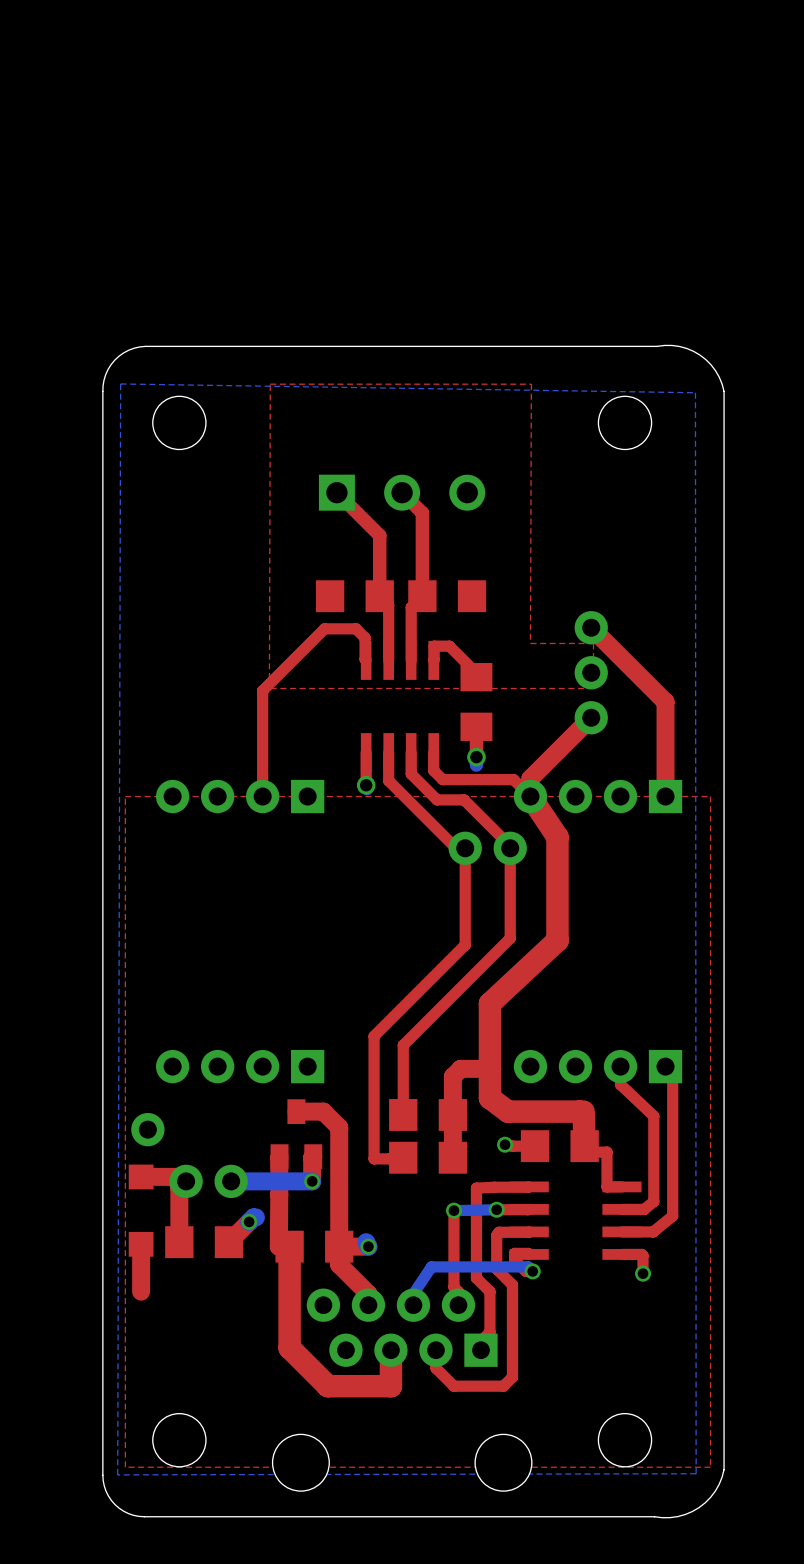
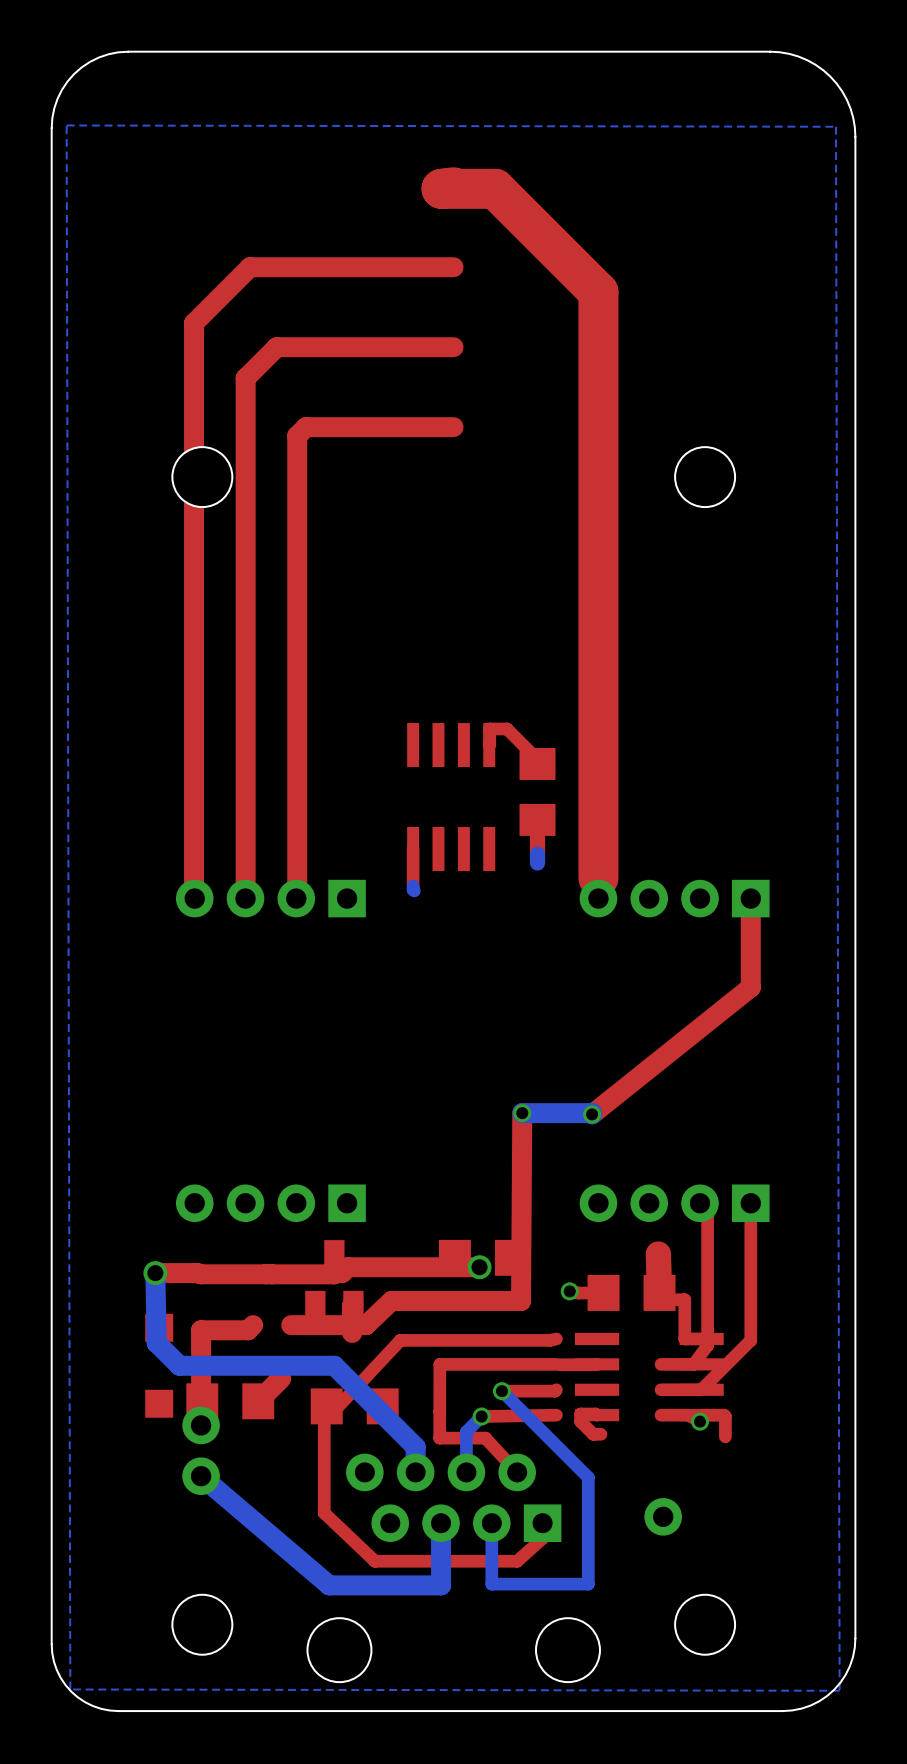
top track: none -> (453, 267) (250, 267) (194, 323) (194, 898)
top track: none -> (453, 347) (276, 347) (245, 378) (245, 898)
bottom zone outline: (120, 383) (117, 1474) (696, 1473) (695, 392) (120, 383) -> (66, 125) (835, 126) (839, 1690) (70, 1689) (66, 125)
top zone outline: (531, 384) (270, 384) (269, 688) (593, 688) (593, 643) (530, 643) (531, 384) -> none
top track: (336, 492) (379, 535) (379, 596) (388, 605) (388, 660) -> none
top track: (402, 492) (422, 512) (422, 596) (411, 607) (411, 660) -> none
part: (402, 492) -> none
part: (354, 596) -> none
part: (447, 596) -> none
top track: (591, 627) (665, 701) (665, 796) -> (592, 1114) (750, 987) (750, 898)
top track: (366, 660) (365, 637) (356, 628) (324, 628) (262, 690) (262, 796) -> (453, 427) (306, 427) (297, 435) (296, 898)
part: (591, 672) -> none
top track: (591, 717) (530, 778) -> (453, 187) (441, 188) (495, 188) (598, 292) (598, 878)
top track: (388, 752) (388, 780) (465, 857) (465, 945) (374, 1036) (374, 1158) (403, 1157) -> none
top track: (411, 752) (411, 774) (437, 799) (464, 799) (510, 846) (510, 938) (403, 1045) (403, 1114) -> none
top track: (433, 752) (433, 770) (442, 779) (513, 779) (530, 796) (557, 837) (557, 940) (489, 1003) (489, 1098) (507, 1111) (579, 1111) (583, 1115) -> none
via: (476, 757) -> none
via: (366, 785) -> none
top zone outline: (710, 796) (710, 1467) (125, 1467) (125, 796) (710, 796) -> none
part: (487, 848) -> none
top track: none -> (522, 1113) (521, 1301) (391, 1301) (366, 1325) (291, 1325)
bottom track: none -> (522, 1113) (592, 1114)
via: none -> (522, 1113)
via: none -> (592, 1114)
top track: (620, 1066) (620, 1084) (653, 1116) (653, 1201) (644, 1209) (621, 1209) -> (700, 1203) (707, 1210) (707, 1345) (693, 1364) (661, 1364)
top track: (665, 1066) (672, 1072) (672, 1216) (653, 1231) (621, 1231) -> (750, 1203) (750, 1340) (701, 1389) (661, 1389)
top track: (489, 1068) (460, 1068) (452, 1076) (452, 1157) -> none
top track: (296, 1111) (323, 1111) (339, 1127) (339, 1246) (368, 1246) -> none
top track: none -> (479, 1267) (347, 1267) (341, 1273) (339, 1269) (334, 1274) (155, 1273)
via: none -> (479, 1267)
bottom track: none -> (155, 1273) (156, 1342) (179, 1365) (334, 1365) (415, 1447) (415, 1472)
via: none -> (155, 1273)
part: (147, 1129) -> none
top track: (279, 1156) (278, 1246) (289, 1246) (289, 1347) (327, 1386) (390, 1386) (390, 1350) -> none
part: (428, 1157) -> none
top track: none -> (253, 1325) (248, 1330) (201, 1330) (201, 1425)
top track: (141, 1176) (177, 1176) (177, 1181) (186, 1181) (186, 1188) (179, 1188) (179, 1242) -> none
part rotation: 0° (208, 1181) -> 90° clockwise (201, 1450)
part position: (208, 1181) -> (201, 1450)
bottom track: (312, 1181) (231, 1181) -> none
via: (312, 1181) -> none
top track: (529, 1186) (476, 1188) (476, 1278) (489, 1291) (489, 1332) (480, 1341) (480, 1350) -> (556, 1338) (400, 1340) (324, 1421) (324, 1513) (375, 1561) (517, 1561) (542, 1538) (542, 1523)
bottom track: (496, 1209) (453, 1210) -> none
via: (496, 1209) -> none
top track: (453, 1210) (453, 1287) (458, 1291) (458, 1305) -> (556, 1364) (439, 1364) (439, 1438) (485, 1438) (517, 1472)
via position: (453, 1210) -> (501, 1391)
bottom track: (255, 1217) (249, 1221) -> none
via: (249, 1221) -> none
top track: none -> (556, 1389) (501, 1391)
top track: (529, 1231) (498, 1232) (496, 1235) (496, 1269) (512, 1284) (512, 1377) (503, 1386) (453, 1386) (435, 1368) (435, 1350) -> none
bottom track: none -> (501, 1391) (588, 1477) (588, 1584) (491, 1584) (491, 1523)
bottom track: (366, 1242) (368, 1246) -> none
top track: (141, 1244) (141, 1291) -> none
top track: (339, 1246) (339, 1264) (368, 1293) (368, 1305) -> none
via: (368, 1246) -> none
top track: none -> (556, 1415) (481, 1416)
top track: none -> (661, 1415) (688, 1415) (700, 1421)
via: none -> (481, 1416)
bottom track: (532, 1271) (528, 1266) (431, 1266) (413, 1293) -> (481, 1416) (466, 1431) (466, 1459)
via: (532, 1271) -> none
via position: (643, 1273) -> (700, 1421)
bottom track: none -> (201, 1476) (329, 1585) (441, 1585) (441, 1523)
part: none -> (663, 1516)
board edge: (654, 1516) (677, 1516) (699, 1507) (715, 1491) (724, 1469) (724, 391) (719, 377) (705, 359) (686, 348) (672, 345) (145, 346) (128, 350) (119, 356) (105, 374) (102, 391) (102, 1475) (106, 1491) (115, 1504) (128, 1513) (144, 1516) -> (738, 1711) (792, 1710) (819, 1701) (834, 1689) (845, 1674) (854, 1648) (855, 136) (850, 108) (842, 91) (823, 70) (807, 60) (779, 52) (128, 51) (98, 57) (74, 74) (57, 98) (51, 128) (51, 1644) (53, 1661) (60, 1677) (71, 1691) (85, 1702) (109, 1710) (162, 1711)

